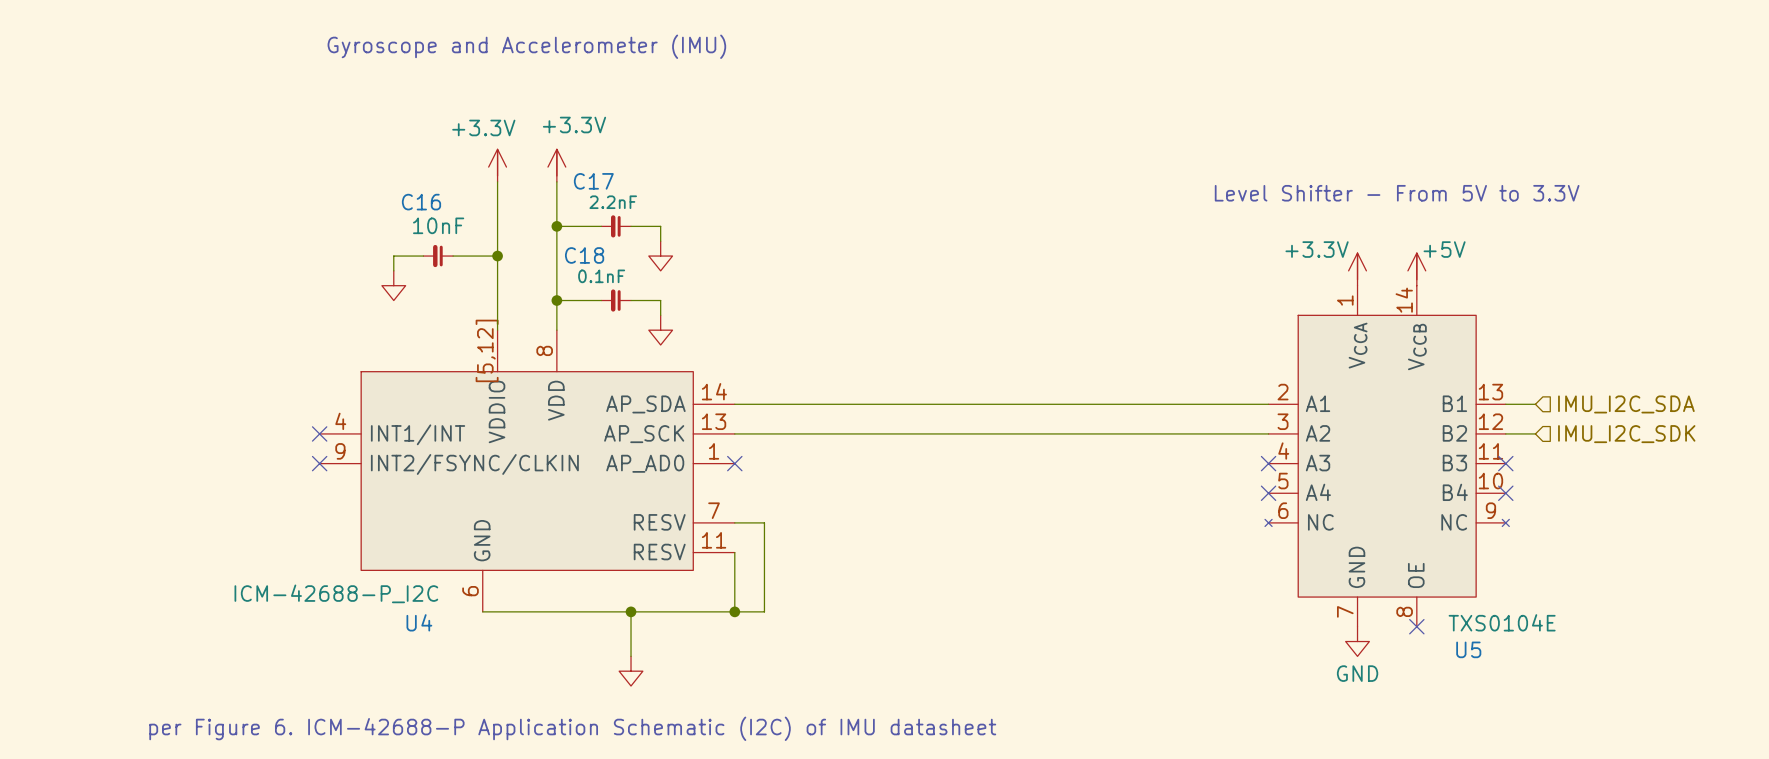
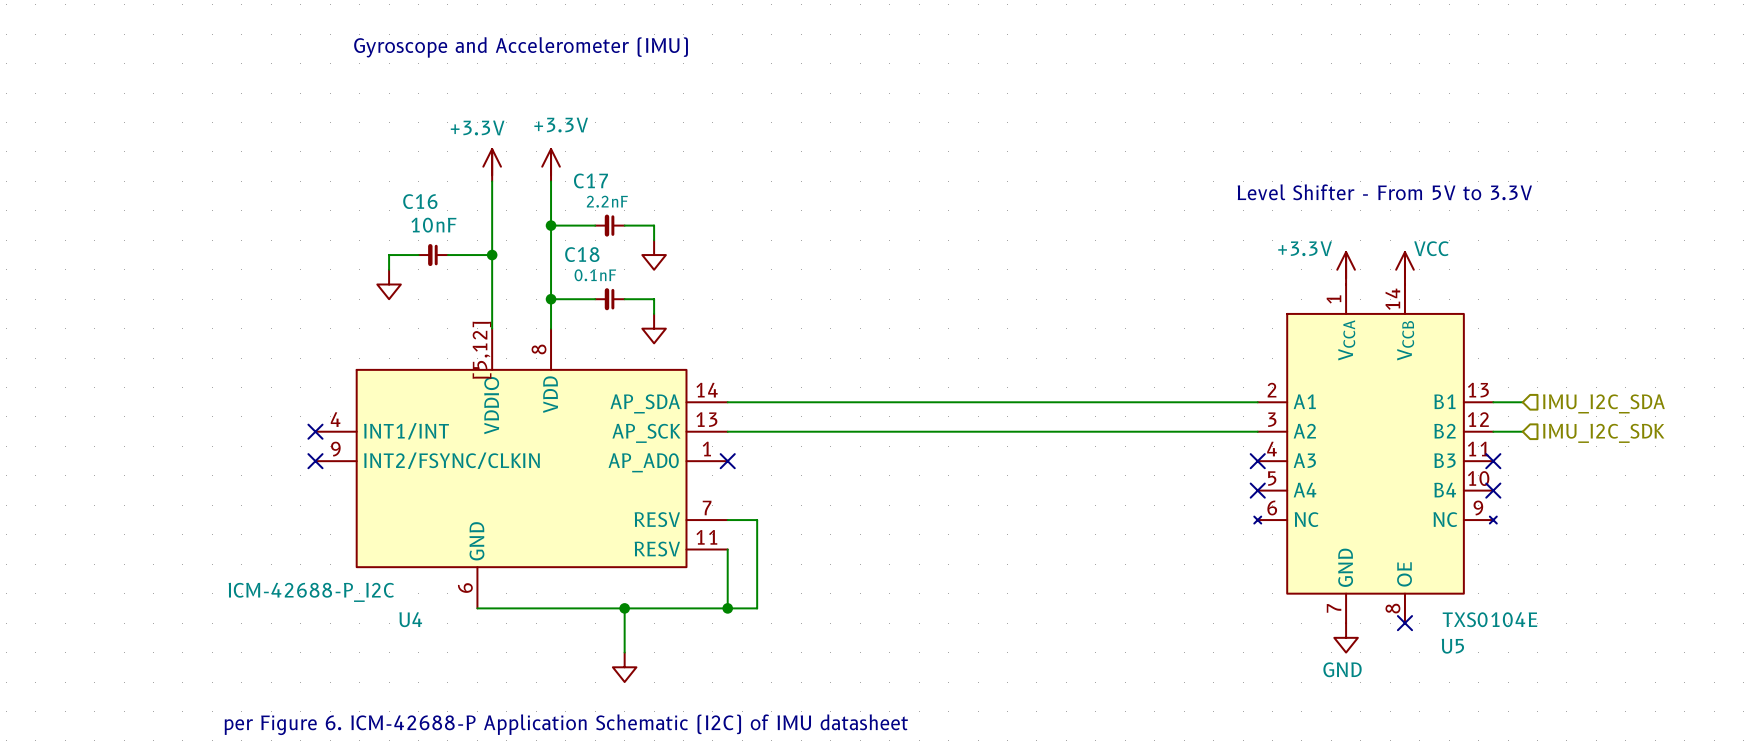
power symbol: +5V (1416, 269) -> VCC (1404, 268)

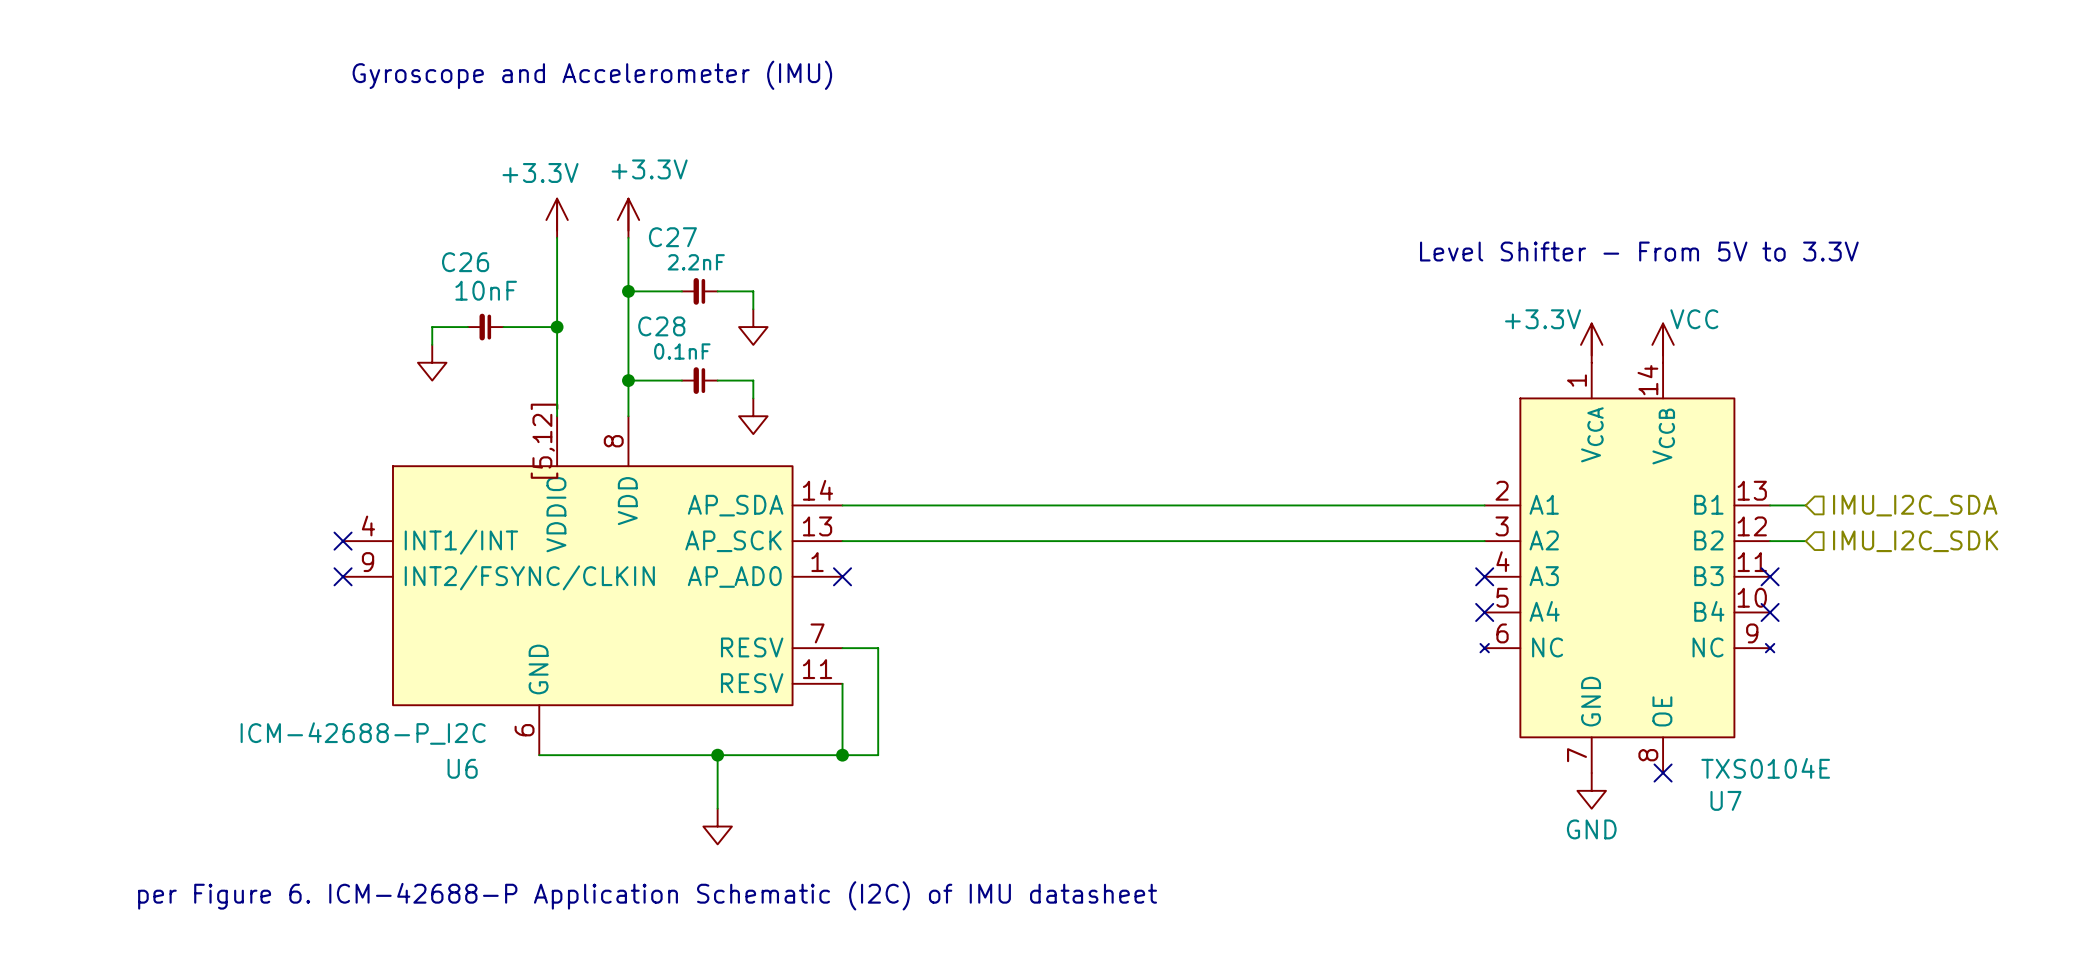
C17 name: C17 (590, 180) -> C27 (672, 237)
C16 name: C16 (420, 201) -> C26 (465, 262)
C18 name: C18 (582, 254) -> C28 (661, 326)
U4 name: U4 (410, 619) -> U6 (462, 768)
U5 name: U5 (1452, 646) -> U7 (1725, 800)

